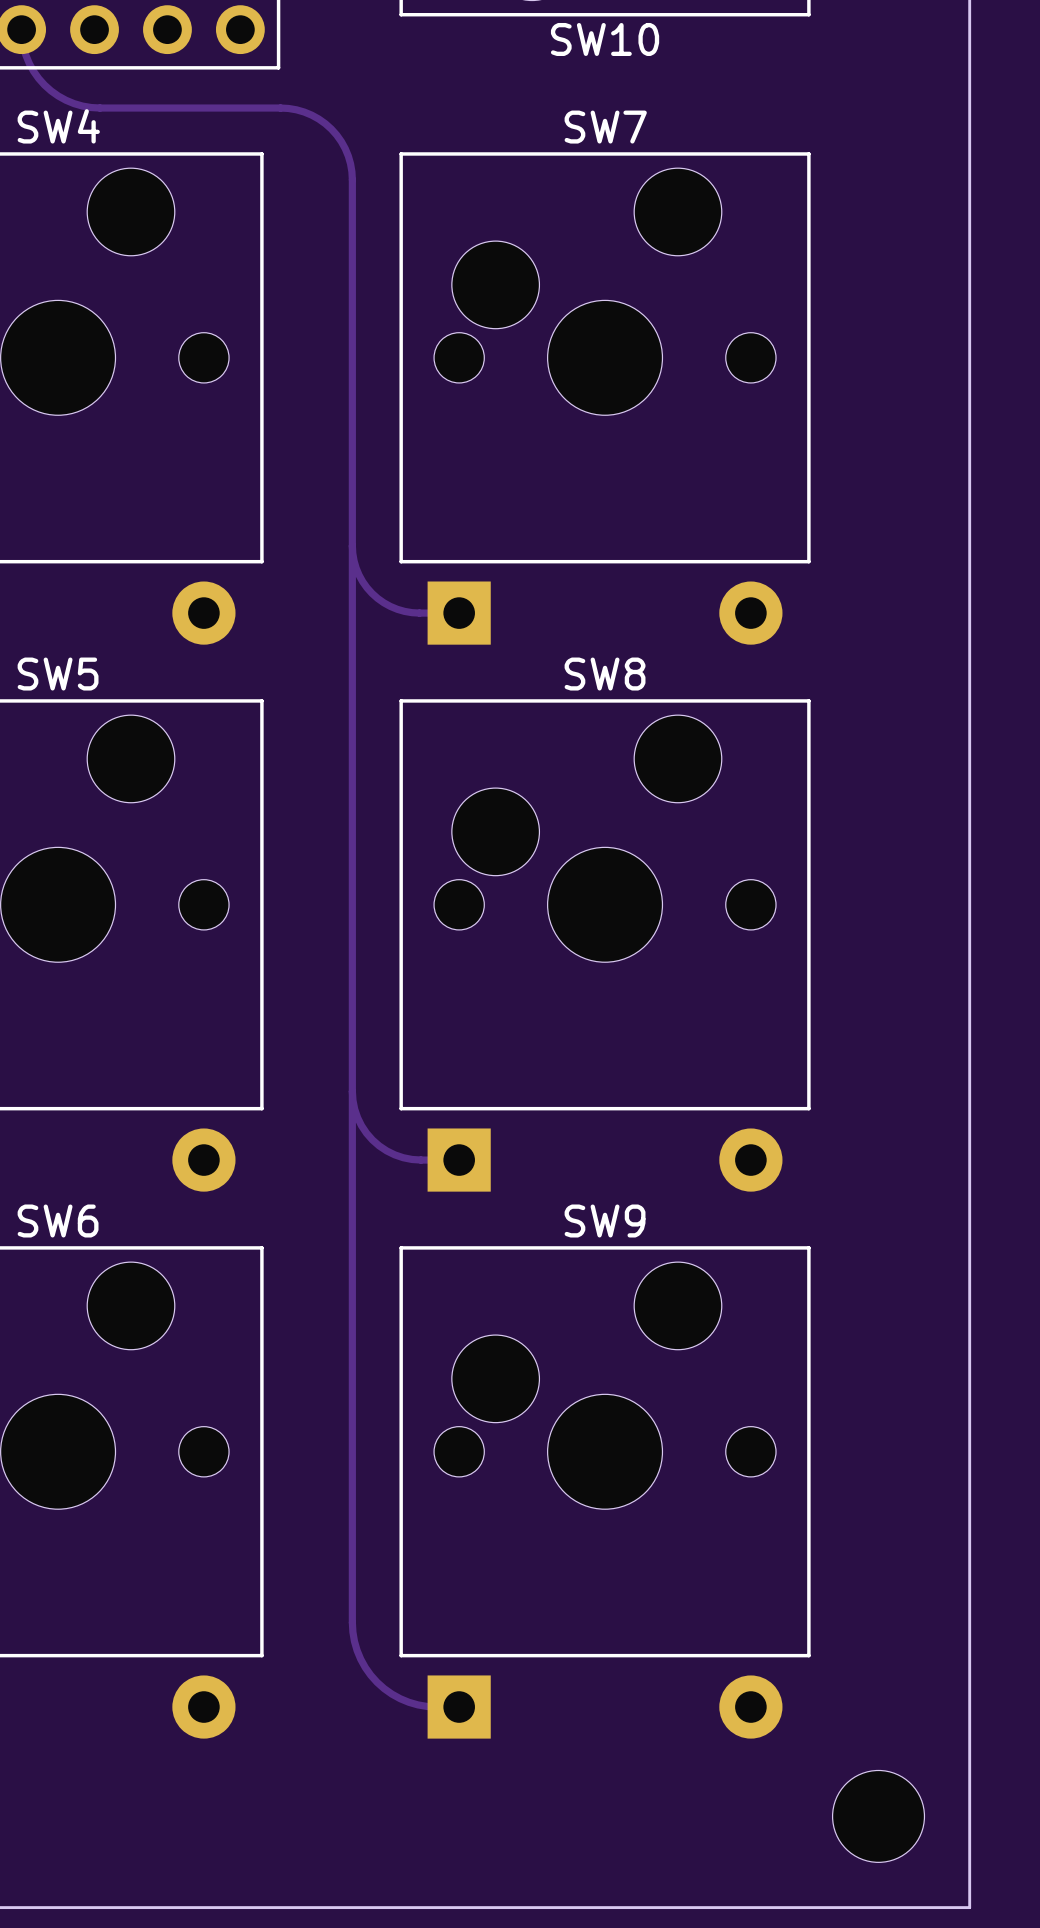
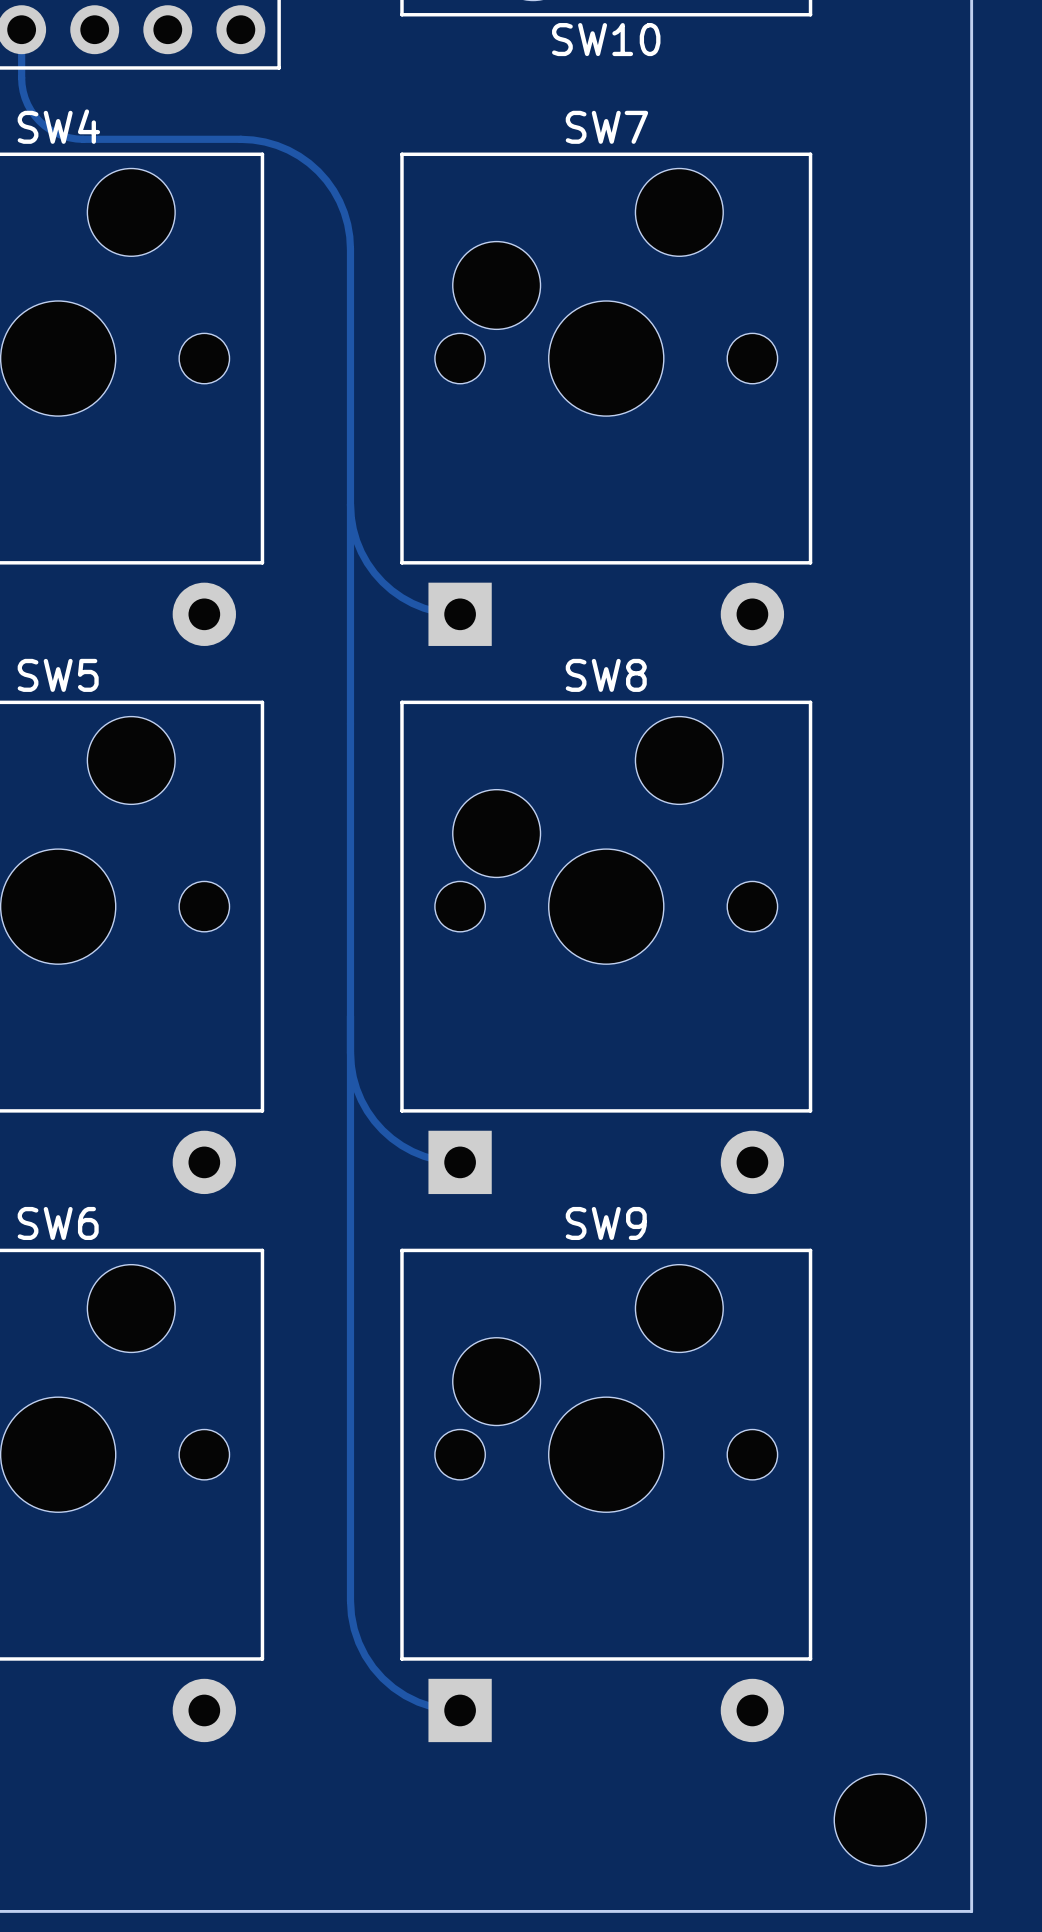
track: (21, 29) (23, 47) (33, 71) (51, 90) (74, 103) (99, 108) (280, 108) (296, 109) (311, 115) (331, 129) (345, 148) (350, 163) (352, 179) (352, 1632) (357, 1650) (365, 1667) (377, 1682) (391, 1694) (417, 1704) (459, 1707) -> (21, 29) (23, 91) (27, 104) (35, 116) (50, 129) (62, 135) (76, 138) (240, 139) (277, 145) (299, 156) (318, 171) (333, 190) (347, 224) (350, 248) (351, 1615) (354, 1629) (365, 1655) (382, 1678) (393, 1687) (418, 1702) (431, 1706) (460, 1710)
track: (352, 545) (354, 560) (359, 575) (367, 587) (383, 602) (397, 609) (412, 612) (459, 613) -> (350, 504) (353, 529) (361, 552) (382, 582) (412, 603) (435, 611) (460, 614)
track: (352, 1091) (354, 1109) (361, 1125) (372, 1139) (386, 1150) (412, 1159) (459, 1160) -> (350, 1052) (353, 1077) (361, 1100) (382, 1130) (412, 1151) (435, 1159) (460, 1162)

